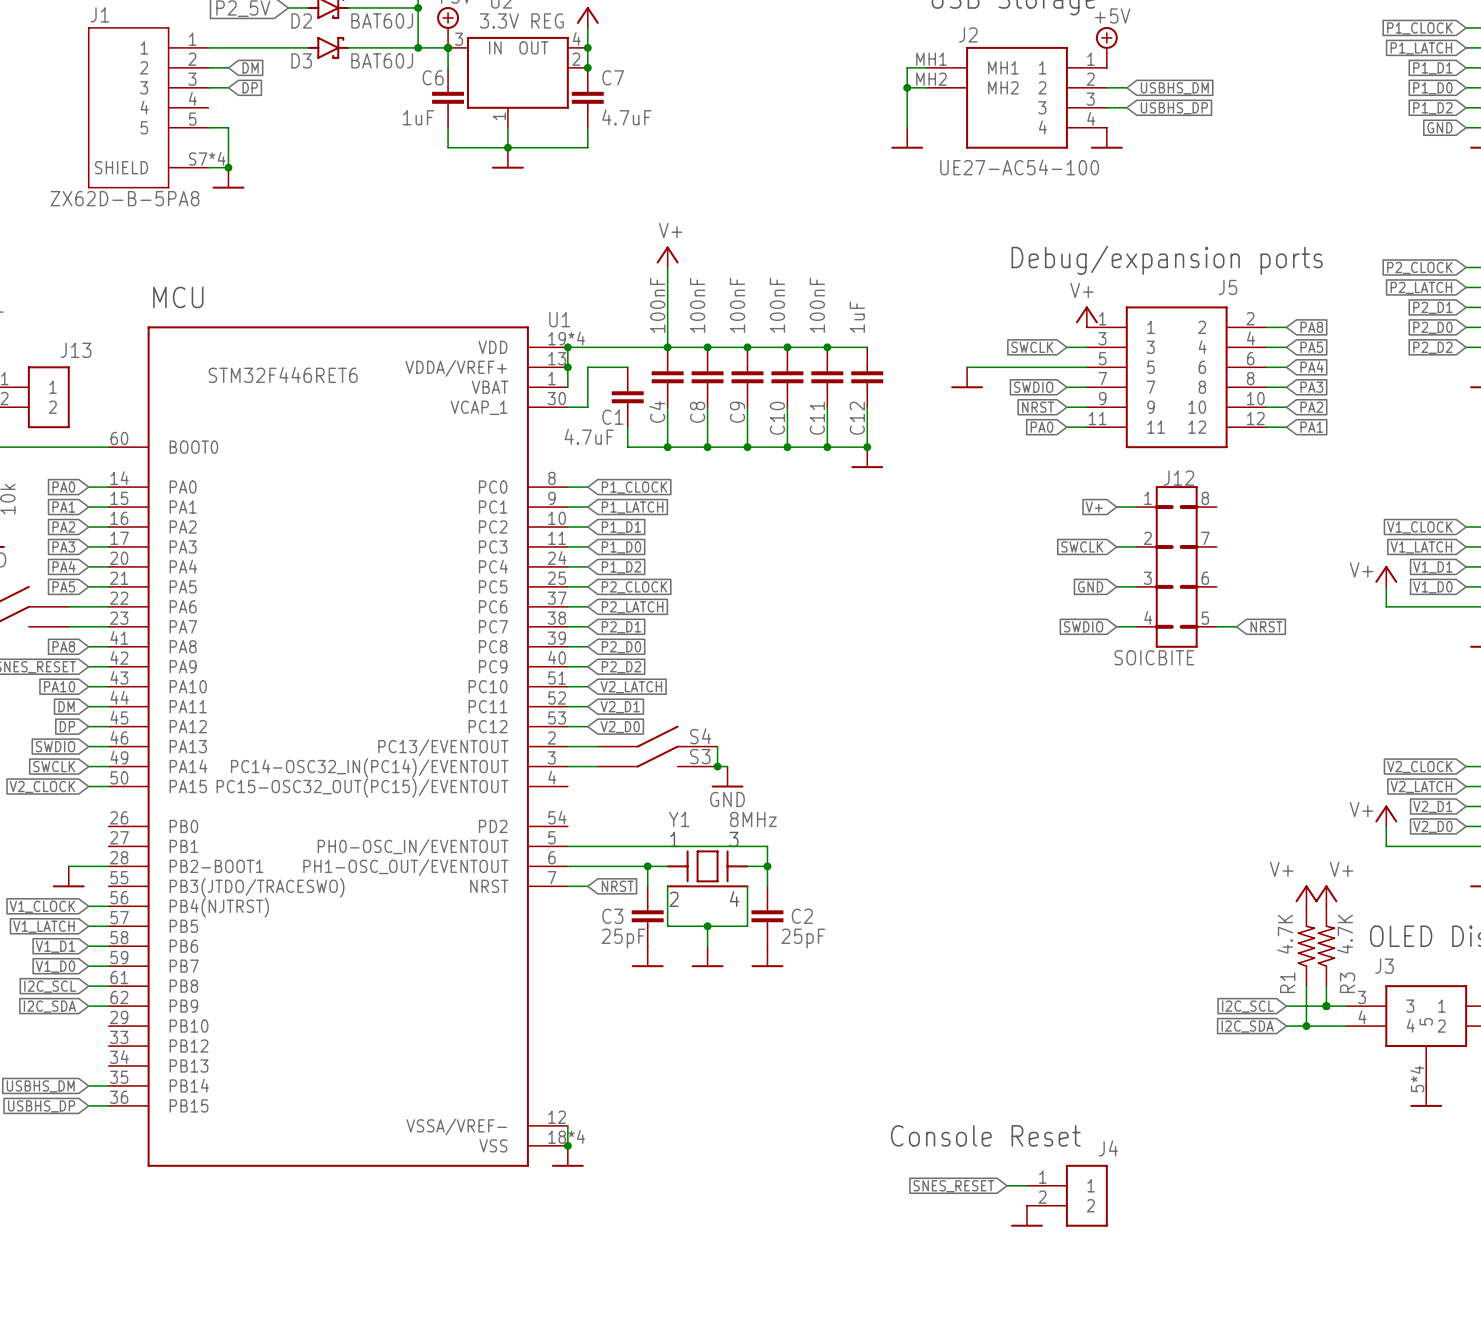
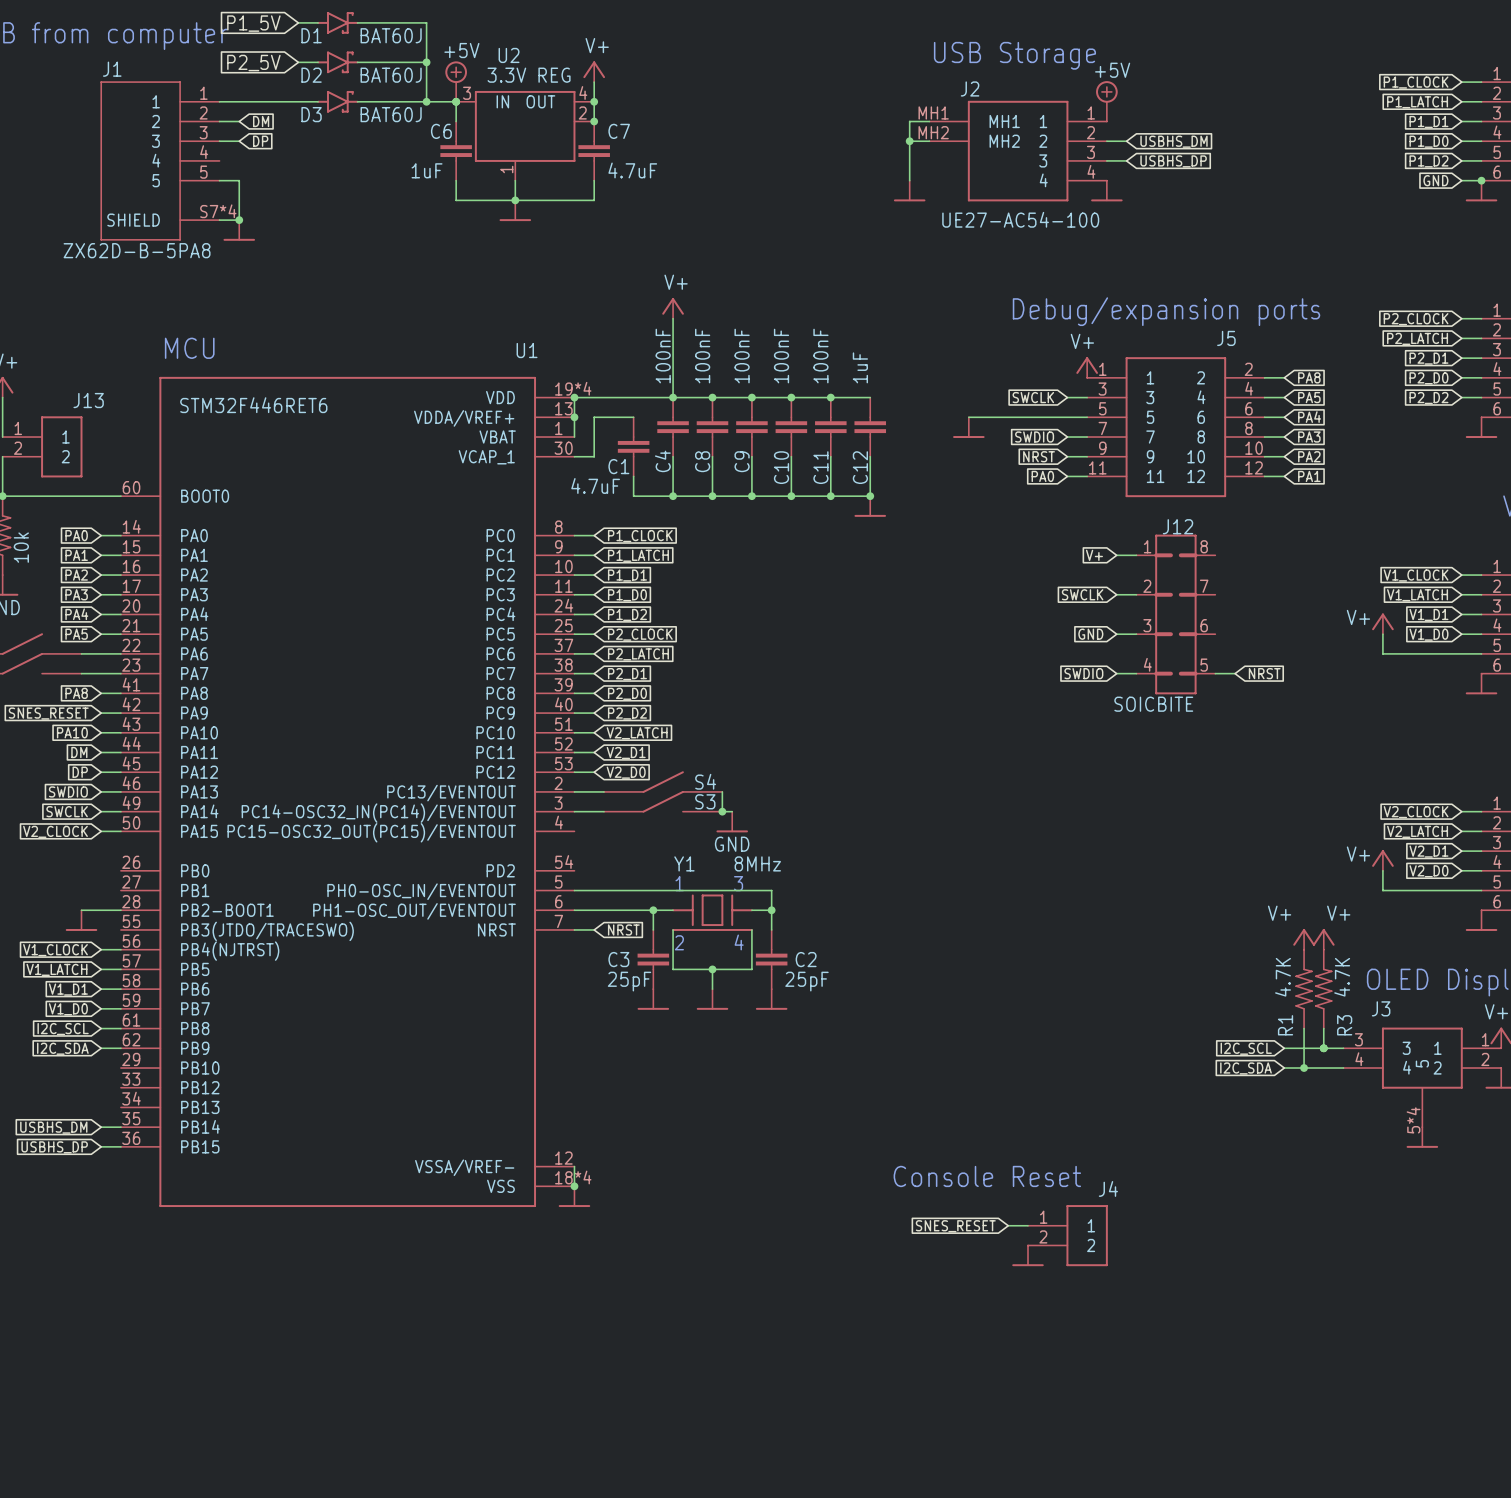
U1 name position: U1 (559, 319) -> U1 (527, 350)
U1 value position: STM32F446RET6 (283, 375) -> STM32F446RET6 (253, 405)

